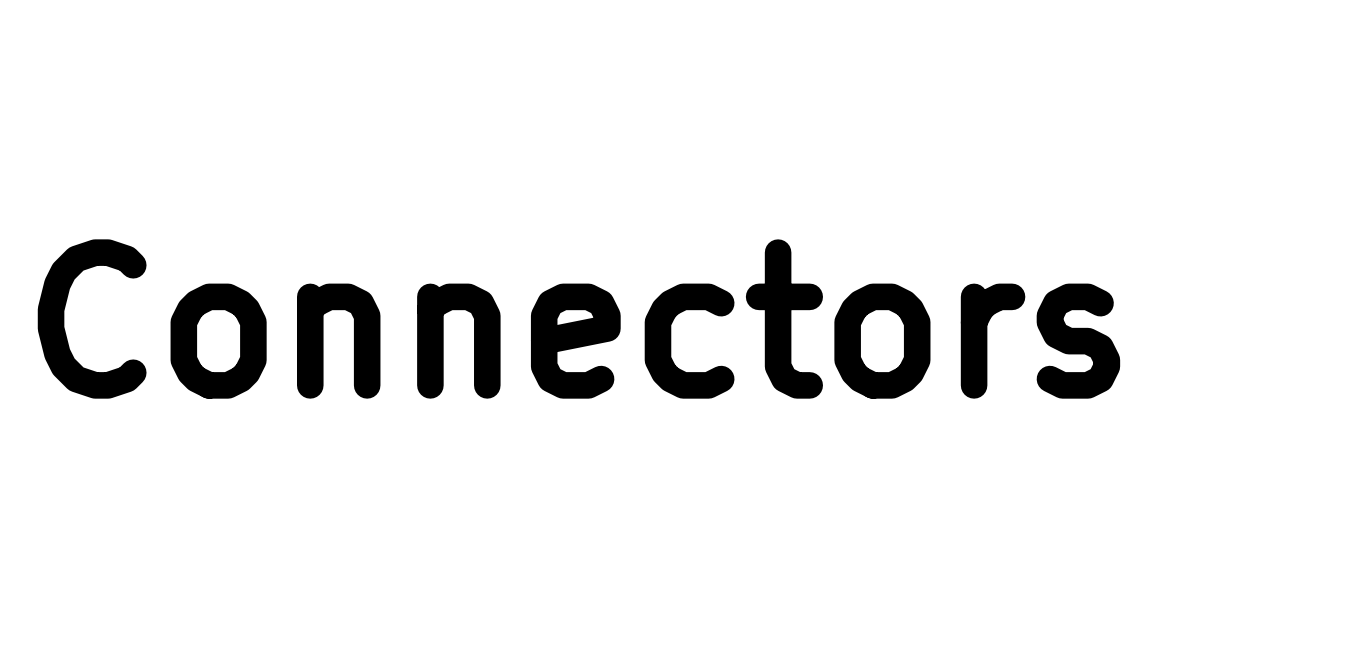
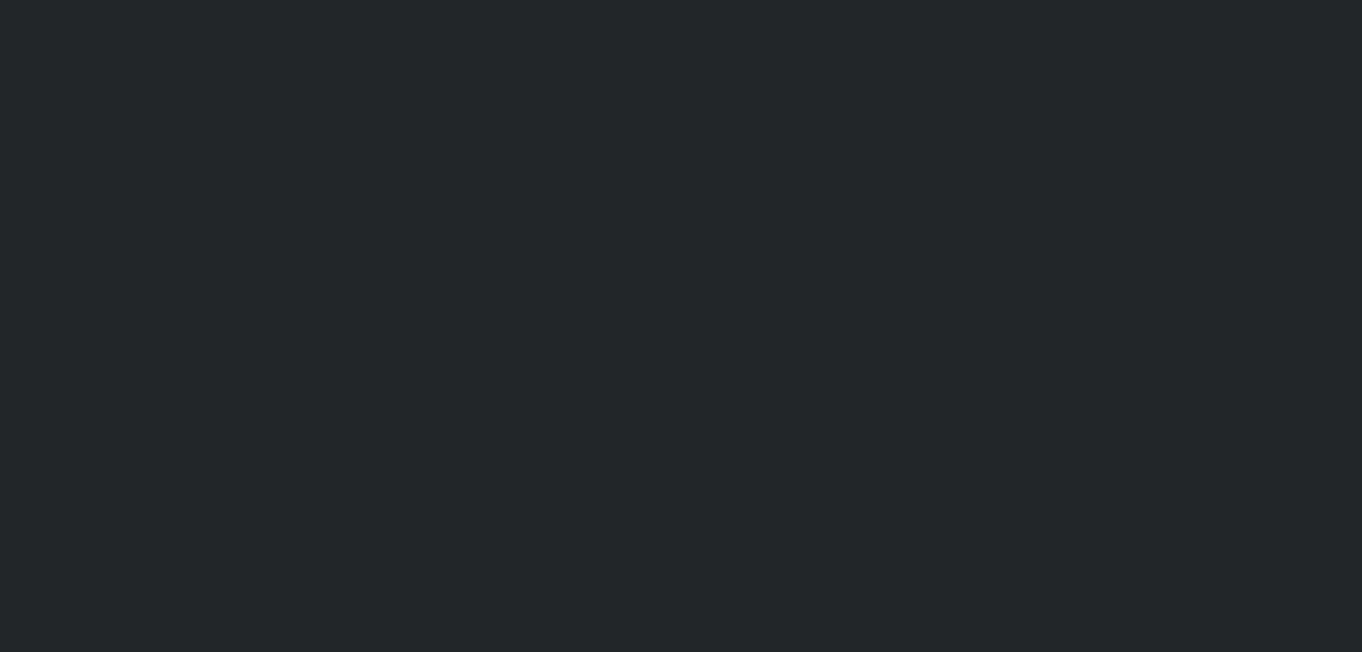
text: Connectors (578, 319) -> none

